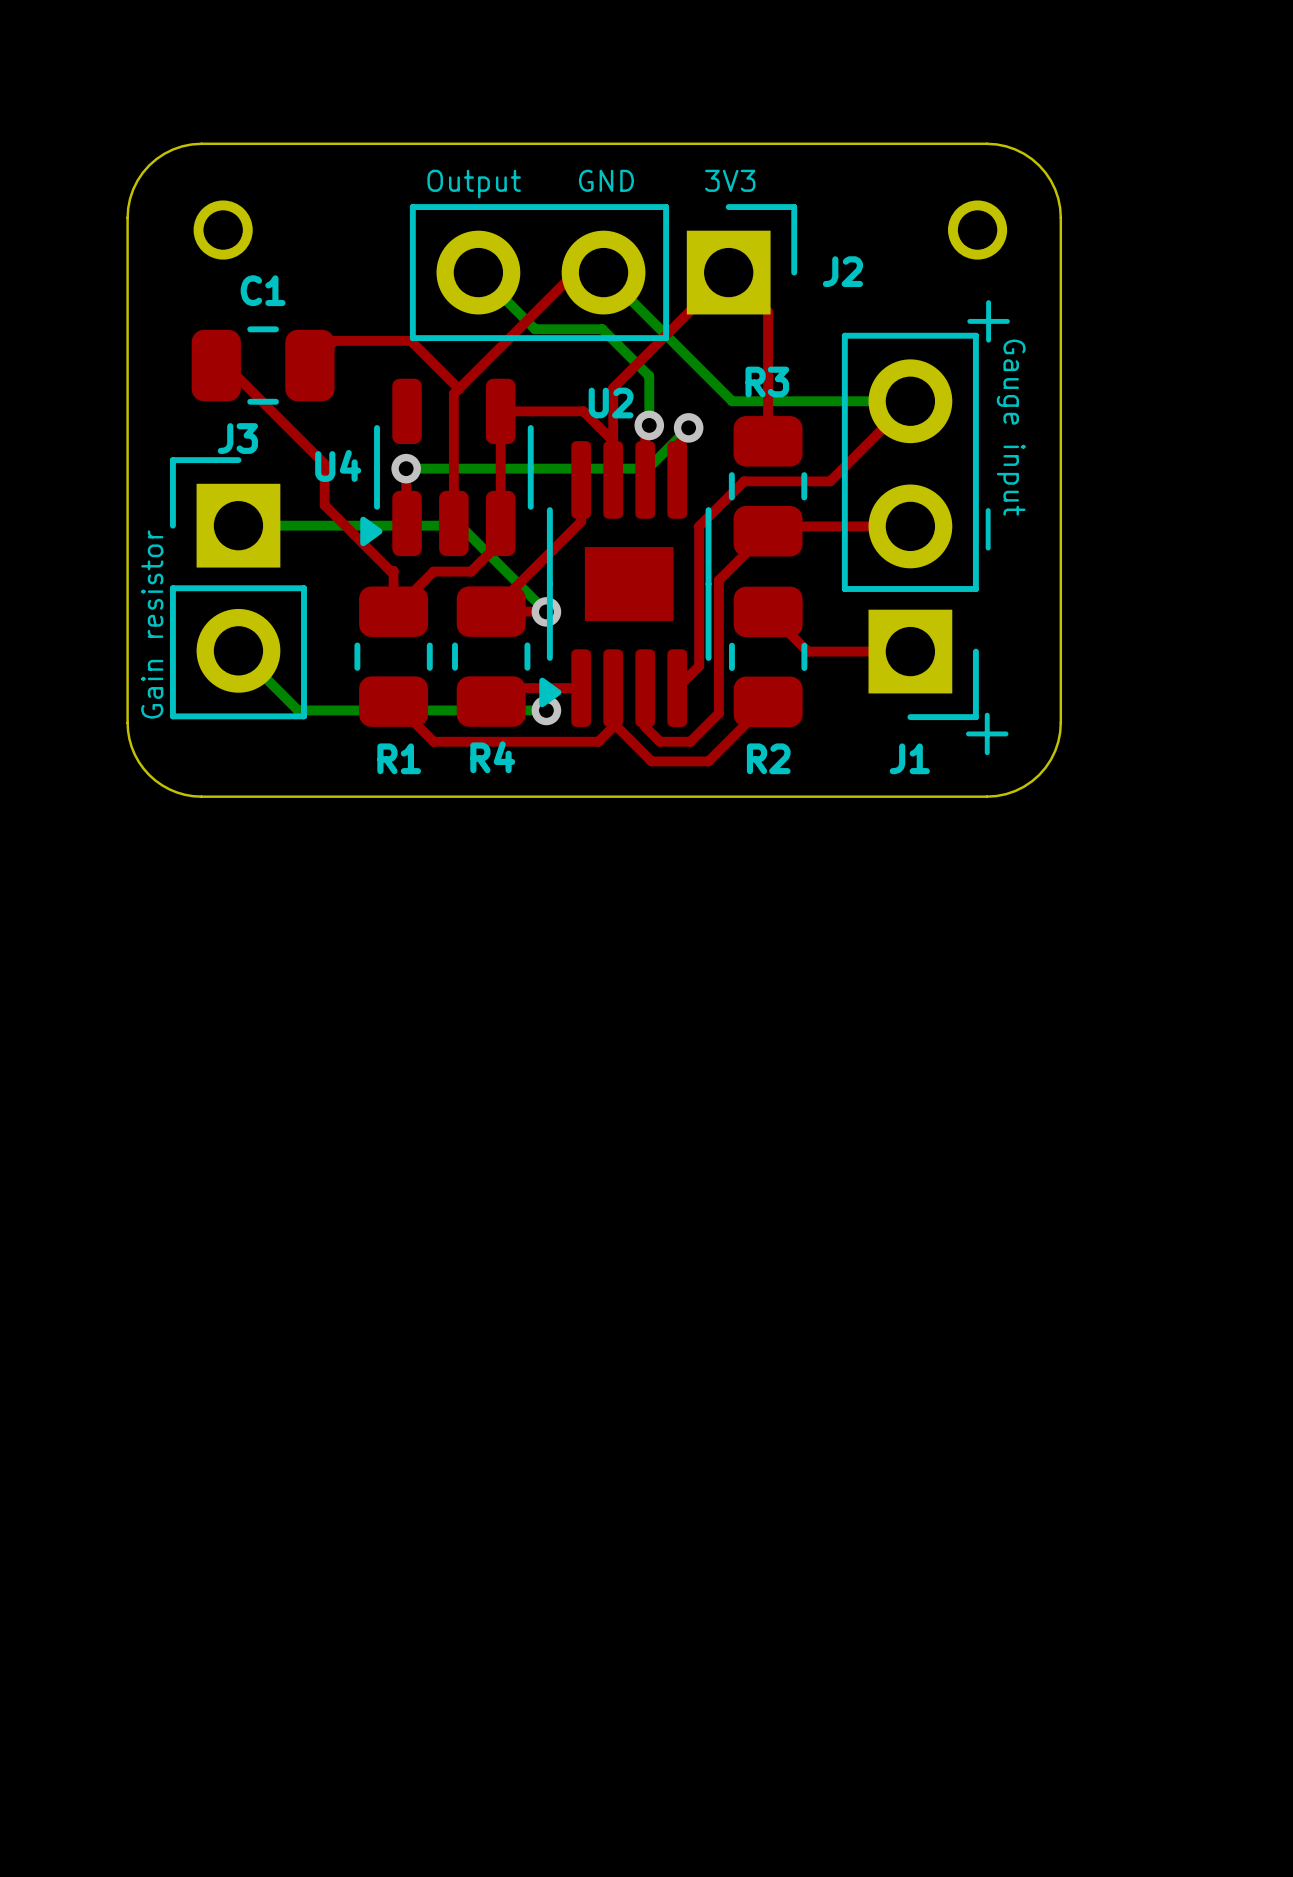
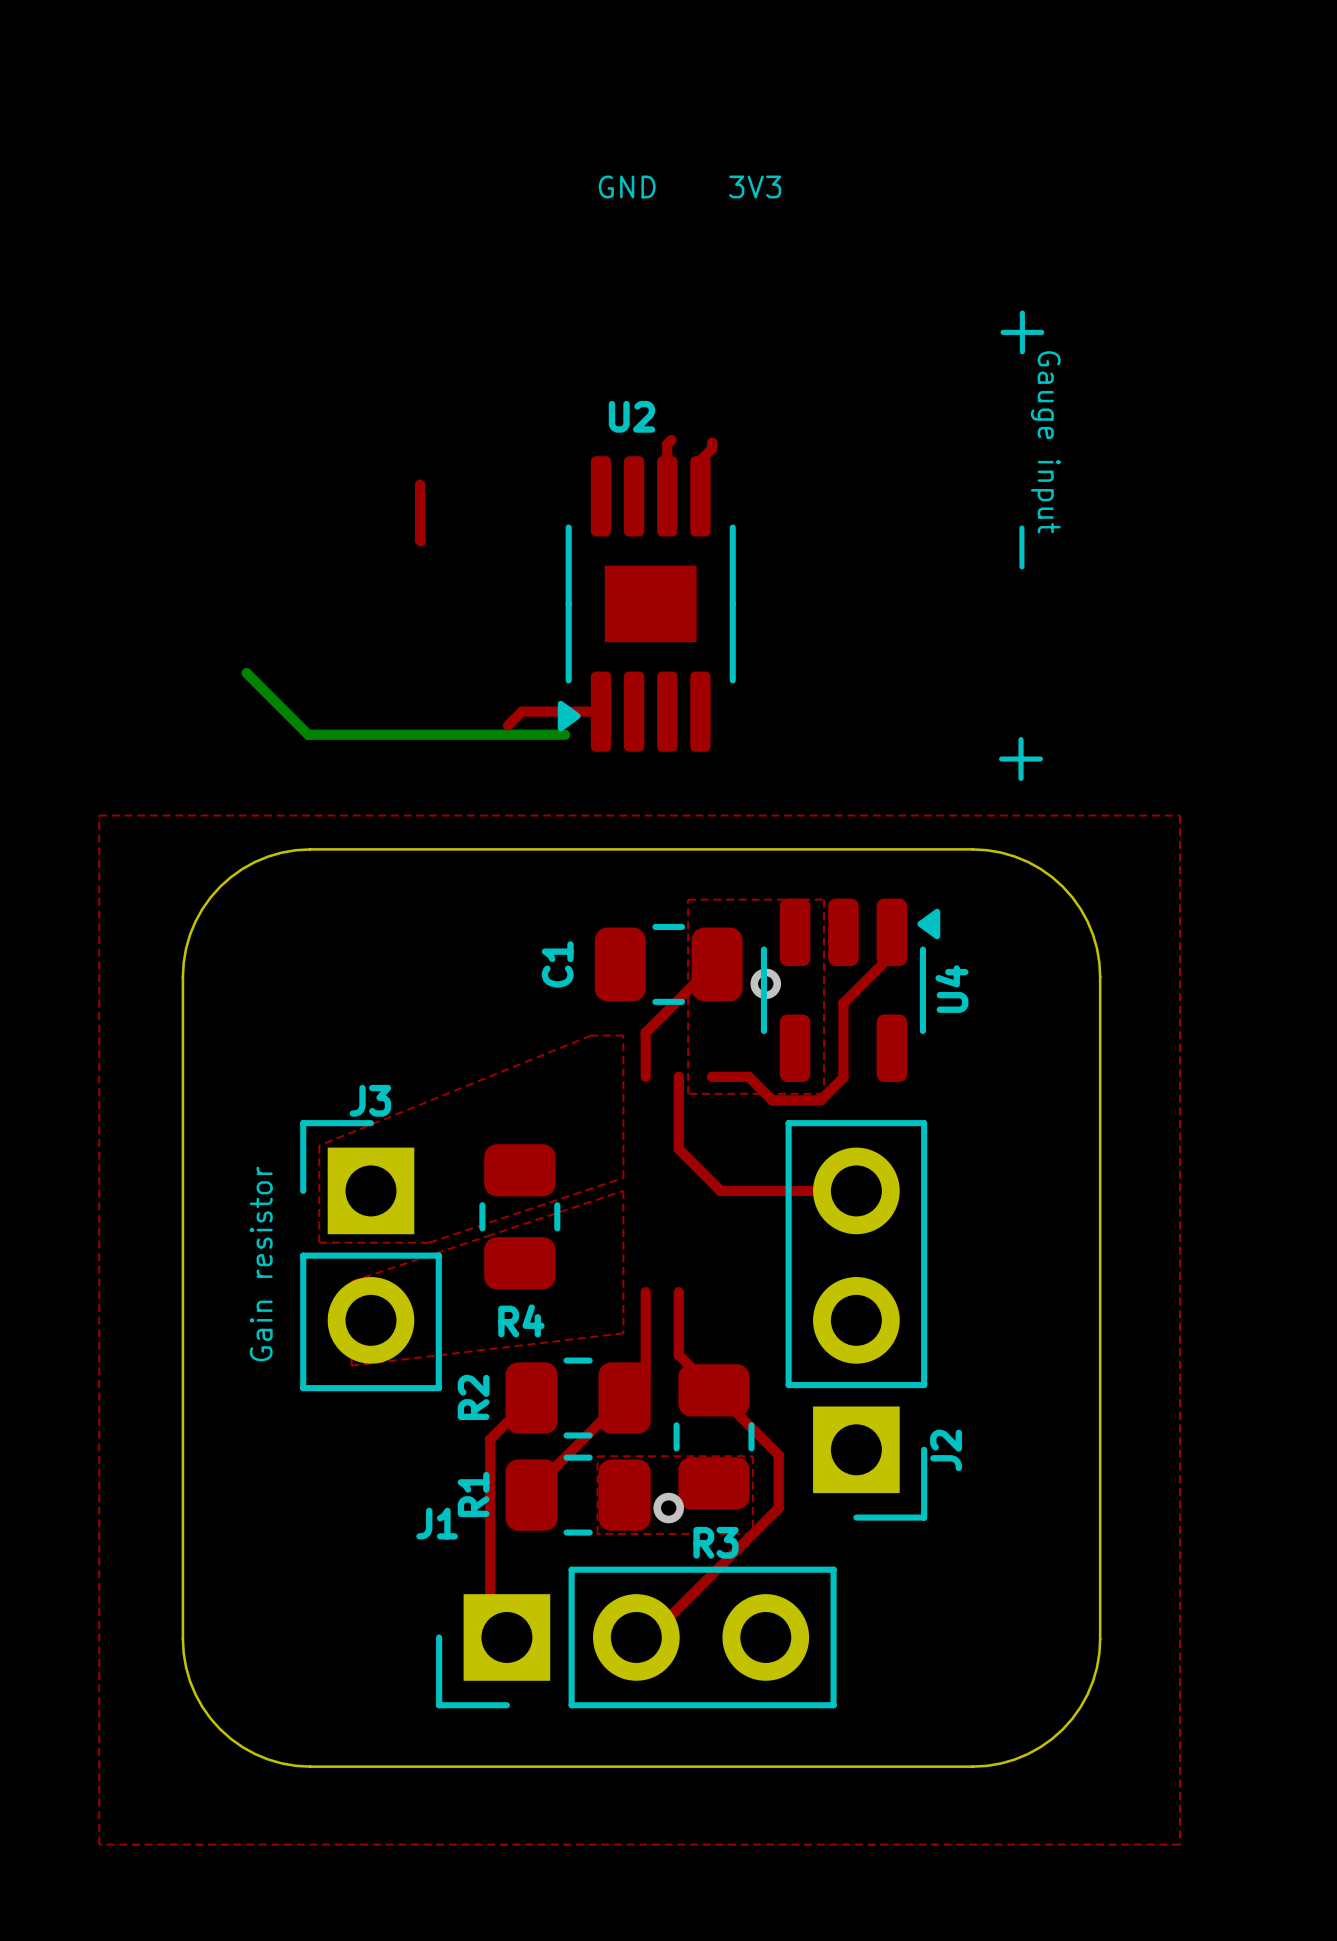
board edge: (201, 143) (986, 143) (1006, 146) (1031, 159) (1045, 172) (1055, 189) (1060, 217) (1060, 722) (1058, 741) (1045, 767) (1031, 781) (1015, 791) (986, 796) (201, 796) (177, 792) (155, 780) (143, 768) (134, 754) (129, 739) (127, 722) (128, 208) (137, 180) (149, 165) (173, 149) (201, 143) -> none
text: Output (474, 184) -> none
round board edge: [193, 200, 253, 260] -> none
round board edge: [948, 200, 1008, 260] -> none
J2 name position: J2 (842, 271) -> J2 (946, 1450)
bottom track: (478, 272) (535, 329) (602, 329) (649, 376) (649, 425) -> none
top track: (603, 272) (575, 272) (453, 393) (453, 523) -> none
bottom track: (603, 272) (732, 401) (910, 401) -> none
J2 rotation: 0° (603, 272) -> 90° clockwise (856, 1320)
J2 position: (603, 272) -> (856, 1320)
C1 name rotation: 0° (263, 290) -> 90° counterclockwise (557, 964)
C1 name position: C1 (263, 290) -> C1 (557, 964)
top track: (216, 365) (226, 365) (324, 464) (324, 505) (390, 570) (393, 570) (393, 611) (433, 571) (471, 571) (500, 541) (500, 411) (583, 411) (613, 441) -> none
C1 position: (263, 365) -> (668, 964)
top track: (309, 365) (334, 340) (410, 340) (458, 388) -> none
R3 name position: R3 (767, 381) -> R3 (715, 1542)
top track: (910, 401) (830, 481) (744, 481) (699, 526) (699, 666) (677, 688) -> none
via: (649, 425) -> none
bottom track: (688, 427) (647, 468) (406, 468) -> none
via: (688, 427) -> none
top track: (768, 441) (768, 311) (728, 272) (613, 388) (613, 479) -> none
U4 rotation: 0° (446, 467) -> 180° (850, 990)
U4 position: (446, 467) -> (850, 990)
via: (406, 468) -> none
top track: (581, 479) (581, 521) (491, 611) (546, 611) -> none
R3 position: (768, 486) -> (714, 1436)
bottom track: (238, 525) (460, 525) (546, 611) -> none
top track: (910, 526) (772, 526) (718, 580) (718, 713) (690, 741) (660, 741) (645, 726) (645, 688) -> none
J1 rotation: 0° (910, 526) -> 90° clockwise (636, 1637)
J1 position: (910, 526) -> (636, 1637)
J3 position: (238, 588) -> (371, 1255)
via: (546, 611) -> none
top track: (768, 611) (807, 651) (910, 651) -> none
text position: Gain resistor (152, 624) -> Gain resistor (261, 1264)
R1 rotation: 0° (393, 656) -> 90° clockwise (578, 1495)
R1 position: (393, 656) -> (578, 1495)
R4 position: (491, 656) -> (519, 1216)
R2 rotation: 0° (768, 656) -> 90° clockwise (578, 1398)
R2 position: (768, 656) -> (578, 1398)
top track: (613, 688) (613, 726) (598, 741) (433, 741) (393, 701) -> none
top track: (768, 701) (708, 761) (651, 761) (613, 722) -> none
via: (546, 710) -> none
J1 name position: J1 (909, 758) -> J1 (437, 1523)
top zone outline: none -> (99, 815) (1179, 815) (1179, 1844) (99, 1844) (99, 815)
board edge: none -> (310, 849) (987, 850) (1001, 852) (1028, 862) (1052, 877) (1072, 897) (1080, 909) (1093, 934) (1099, 962) (1100, 976) (1100, 1639) (1096, 1667) (1087, 1694) (1072, 1718) (1052, 1738) (1028, 1754) (1014, 1759) (1001, 1763) (972, 1766) (310, 1766) (281, 1763) (255, 1754) (230, 1738) (210, 1718) (195, 1694) (190, 1681) (186, 1667) (182, 1639) (183, 962) (186, 948) (195, 921) (202, 909) (220, 886) (242, 868) (268, 856) (281, 852) (310, 849)
top zone outline: none -> (688, 899) (824, 899) (824, 1093) (688, 1093) (688, 899)
top track: none -> (891, 932) (891, 954) (843, 1003) (843, 1077) (820, 1100) (772, 1100) (748, 1076) (711, 1076)
top track: none -> (717, 964) (714, 964) (645, 1032) (645, 1076)
via: none -> (765, 983)
top zone outline: none -> (591, 1035) (623, 1035) (623, 1177) (429, 1242) (319, 1242) (319, 1145) (591, 1035)
top track: none -> (678, 1076) (678, 1149) (720, 1190) (856, 1190)
top zone outline: none -> (623, 1190) (351, 1281) (351, 1365) (623, 1333) (623, 1190)
top track: none -> (645, 1292) (645, 1376) (531, 1491) (531, 1495)
top track: none -> (678, 1292) (678, 1355) (778, 1455) (778, 1508) (649, 1637) (636, 1637)
top track: none -> (531, 1398) (490, 1439) (490, 1620) (506, 1637)
top zone outline: none -> (597, 1456) (752, 1456) (752, 1533) (597, 1533) (597, 1456)
via: none -> (668, 1508)

